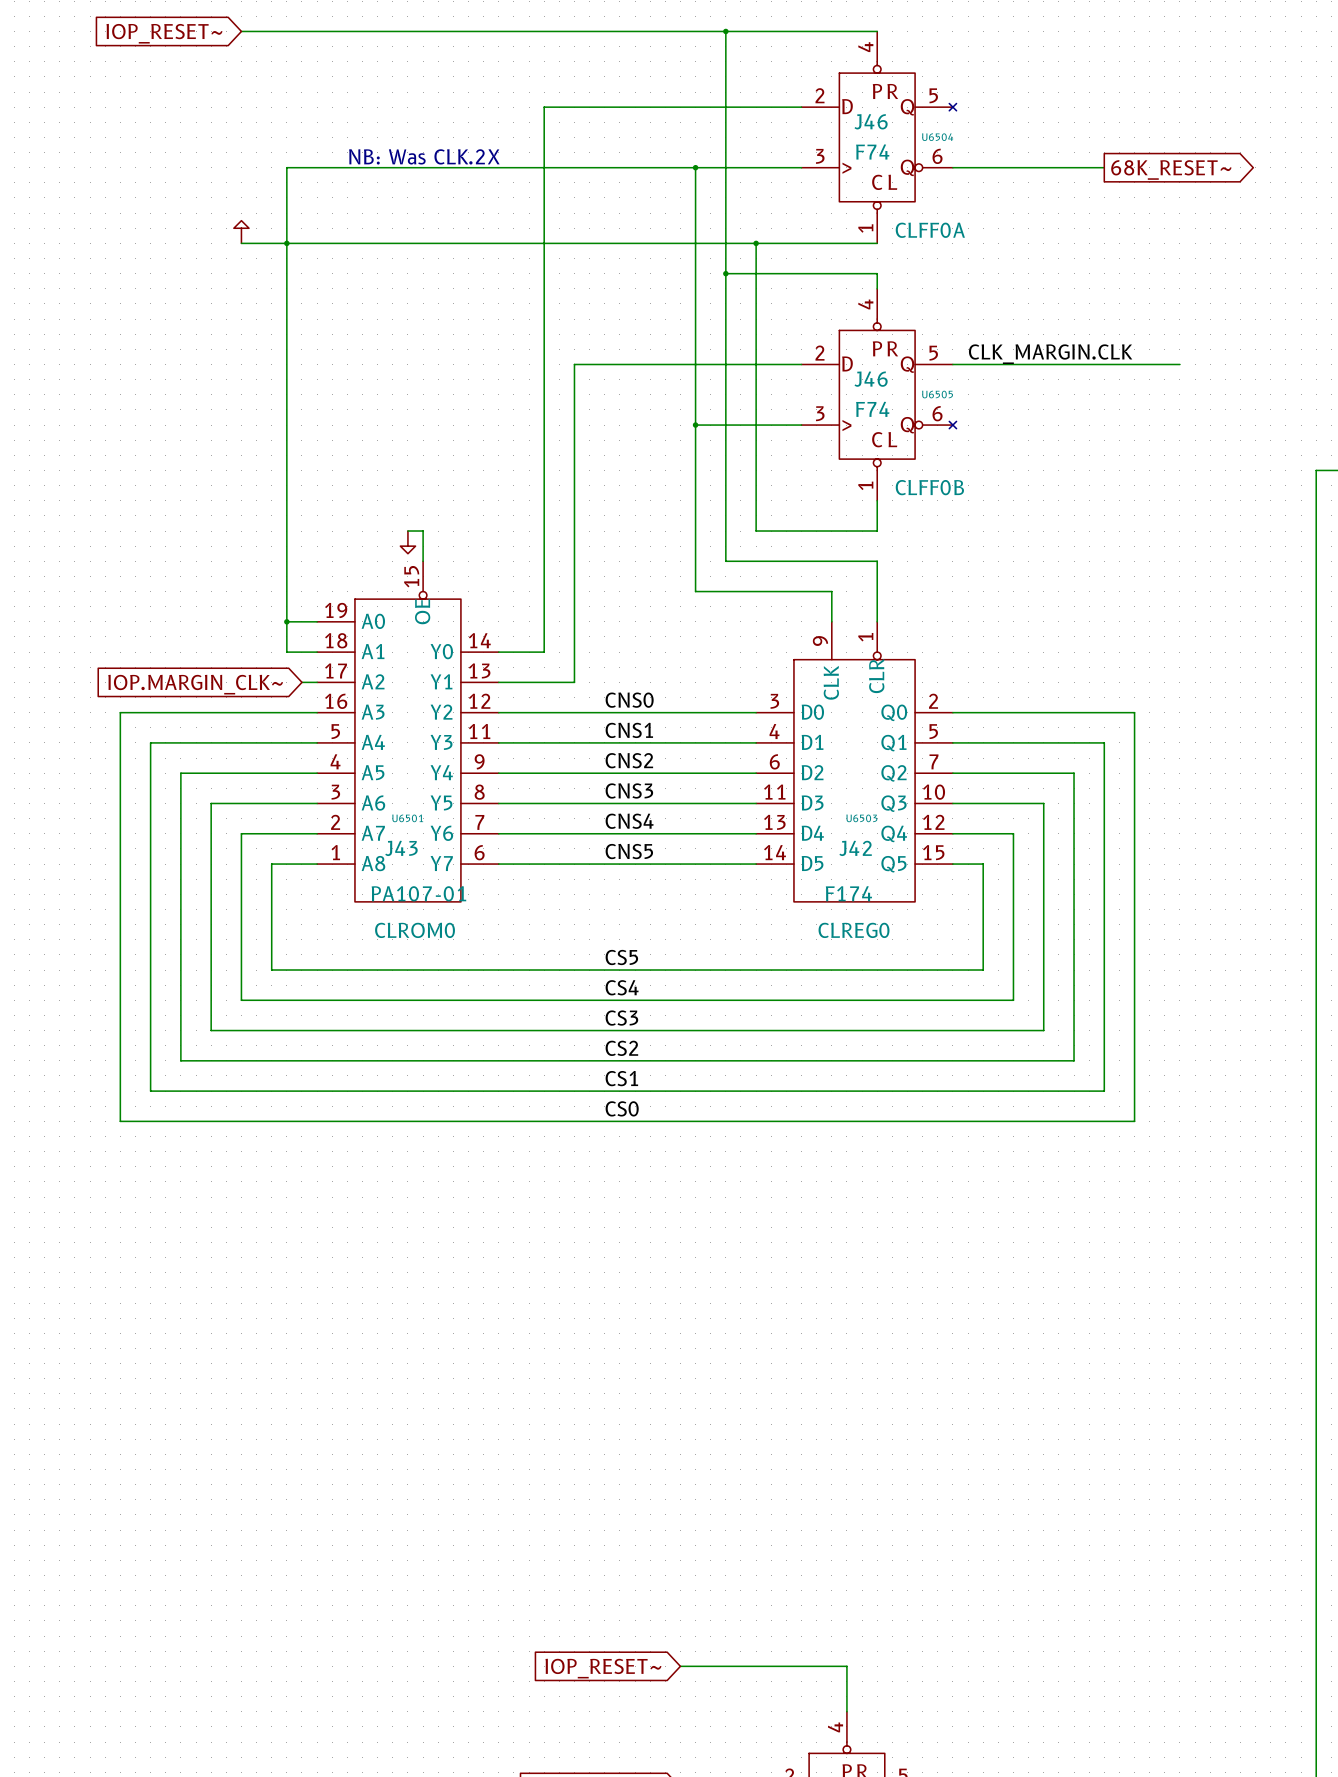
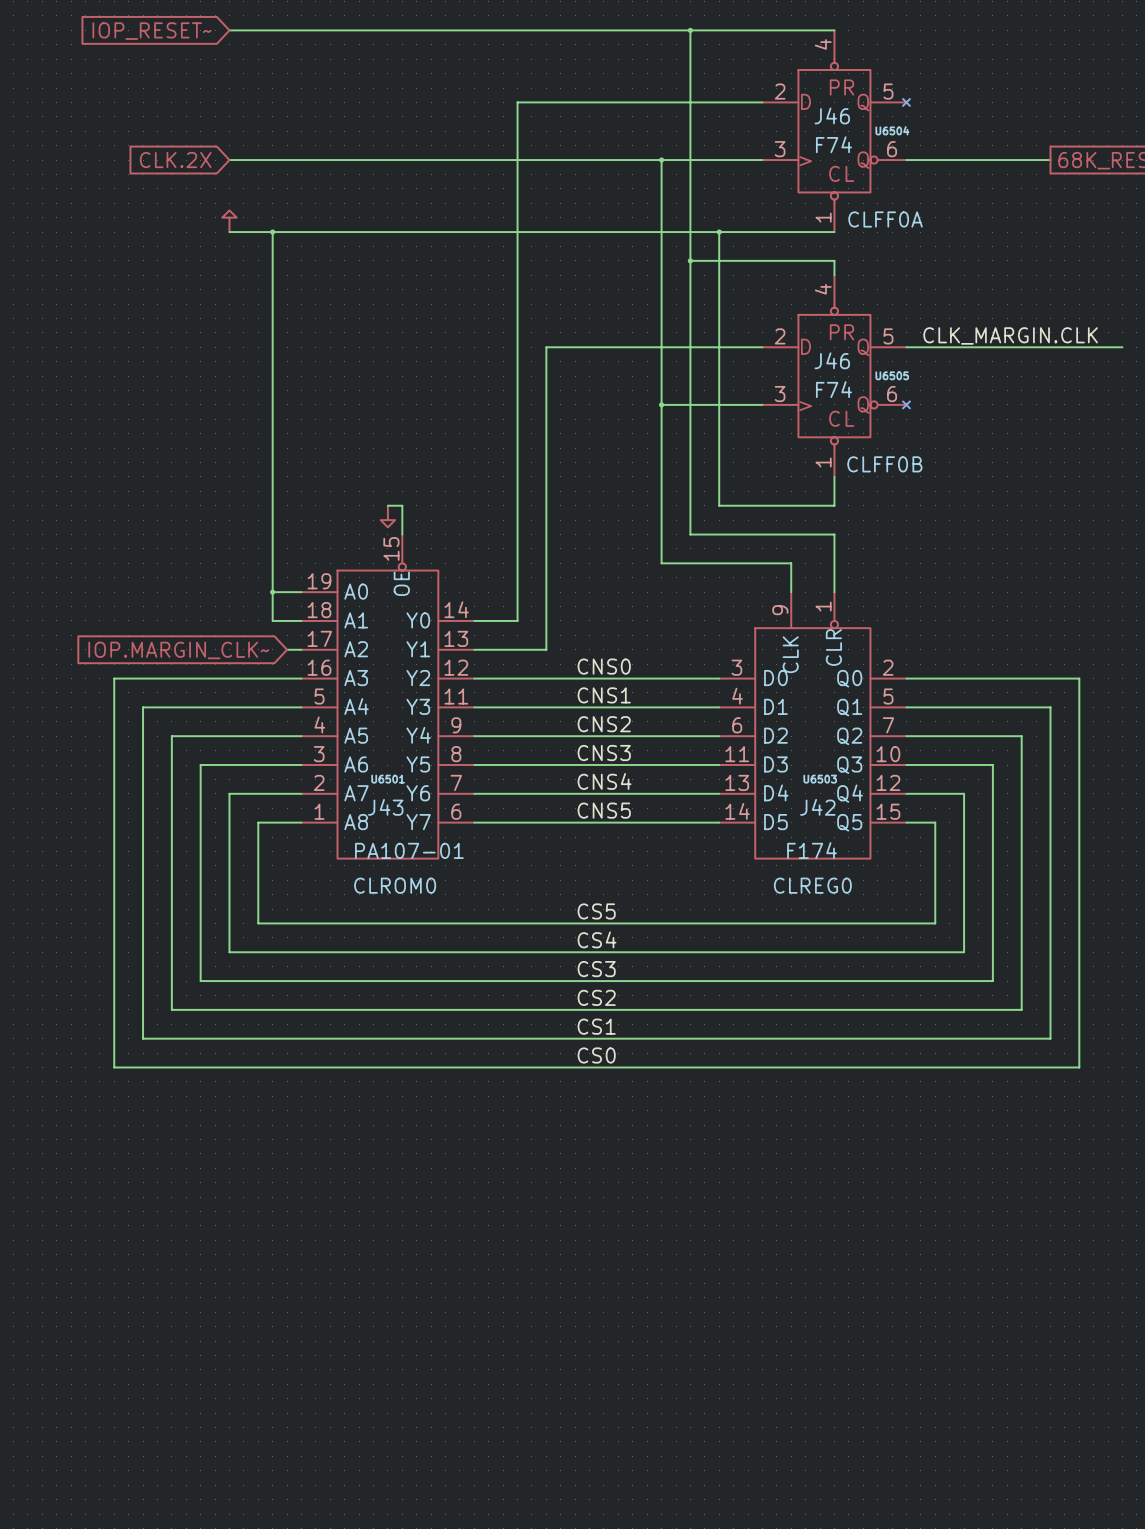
text: NB: Was CLK.2X (424, 156) -> none
global label: none -> CLK.2X (175, 160)
wire: (286, 167) (286, 243) -> (272, 160) (229, 160)

